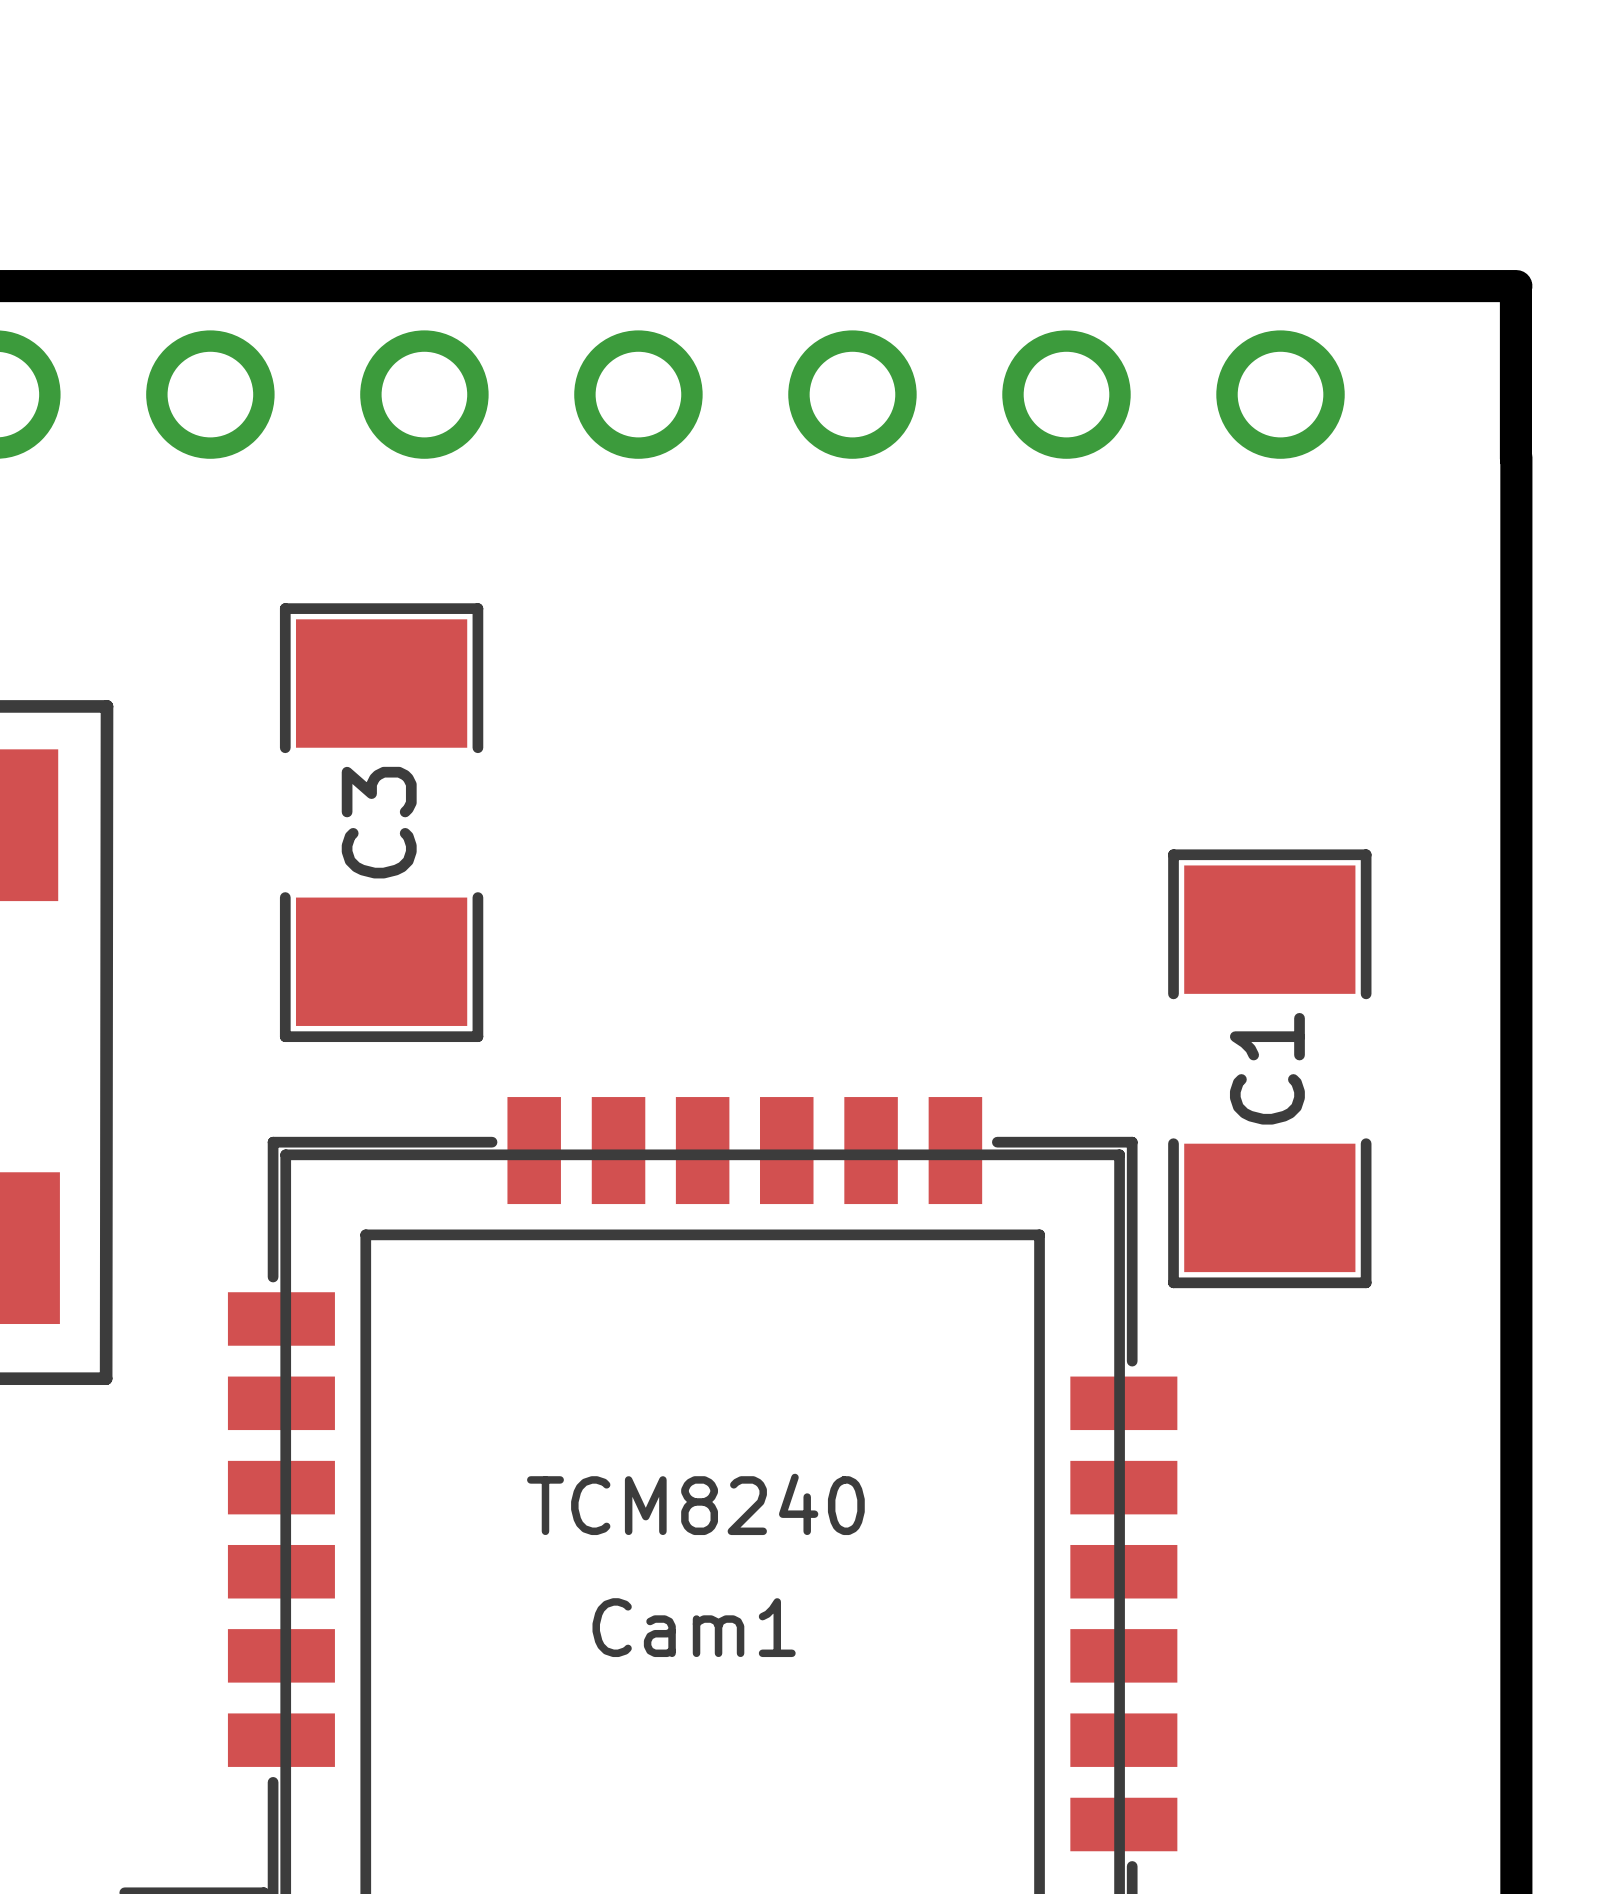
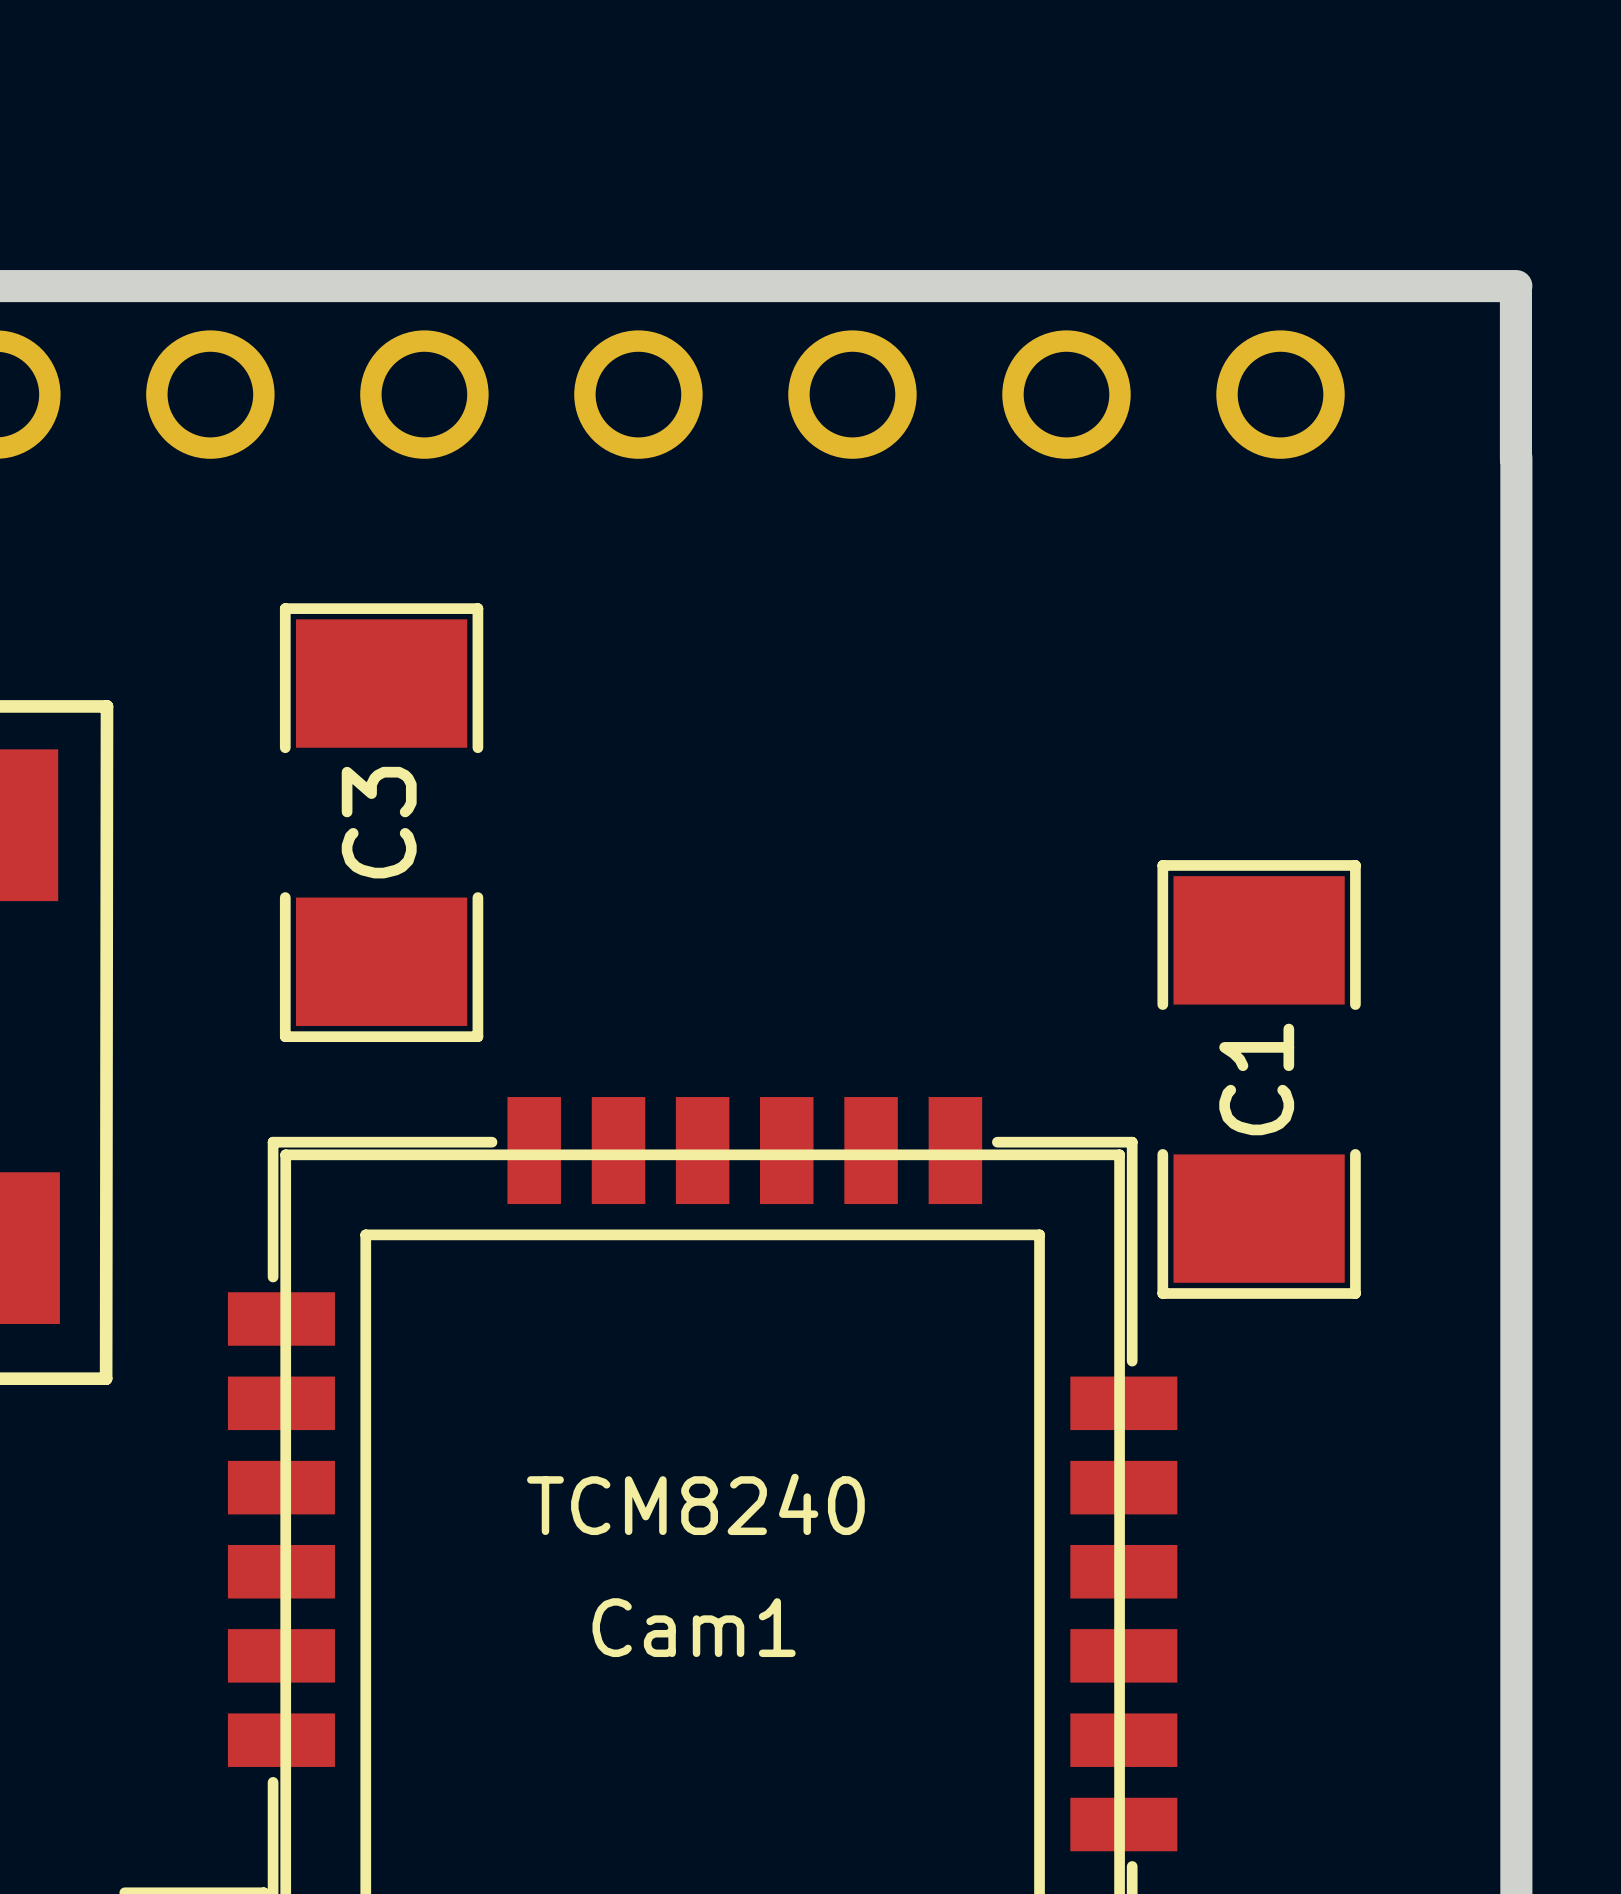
C1 position: (1269, 1068) -> (1259, 1079)

